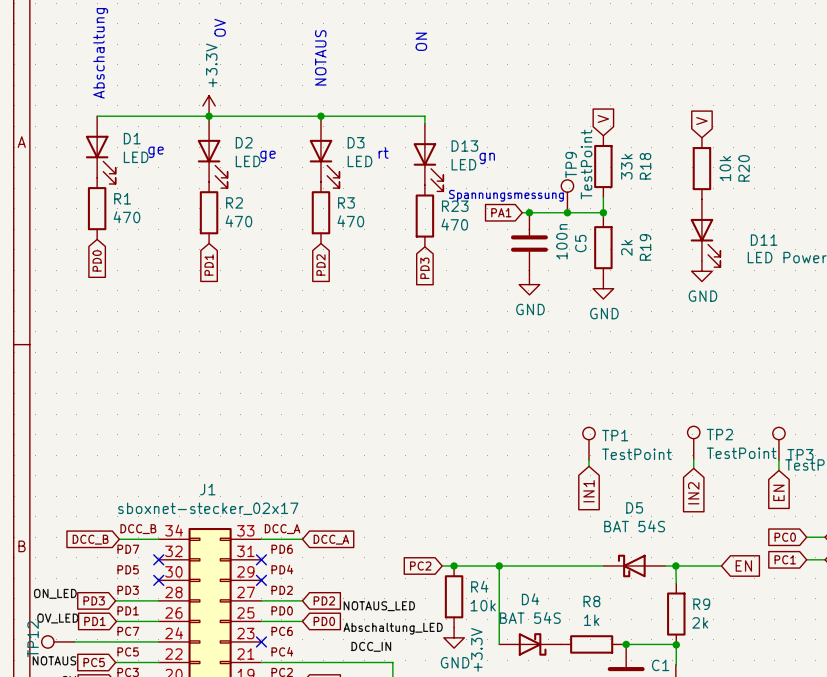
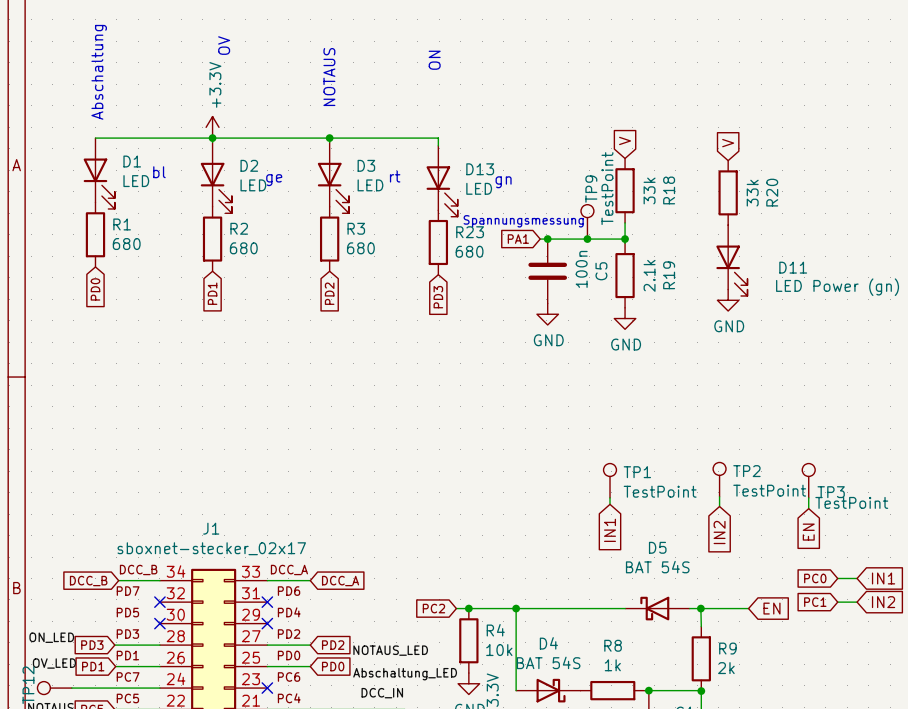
text: ge (156, 152) -> bl (159, 172)
R20 value: 10k (725, 168) -> 33k (752, 193)
R1 value: 470 (126, 217) -> 680 (126, 244)
R2 value: 470 (238, 221) -> 680 (243, 248)
R3 value: 470 (350, 221) -> 680 (360, 248)
R23 value: 470 (454, 224) -> 680 (469, 251)
R19 value: 2k (626, 247) -> 2.1k (649, 275)

